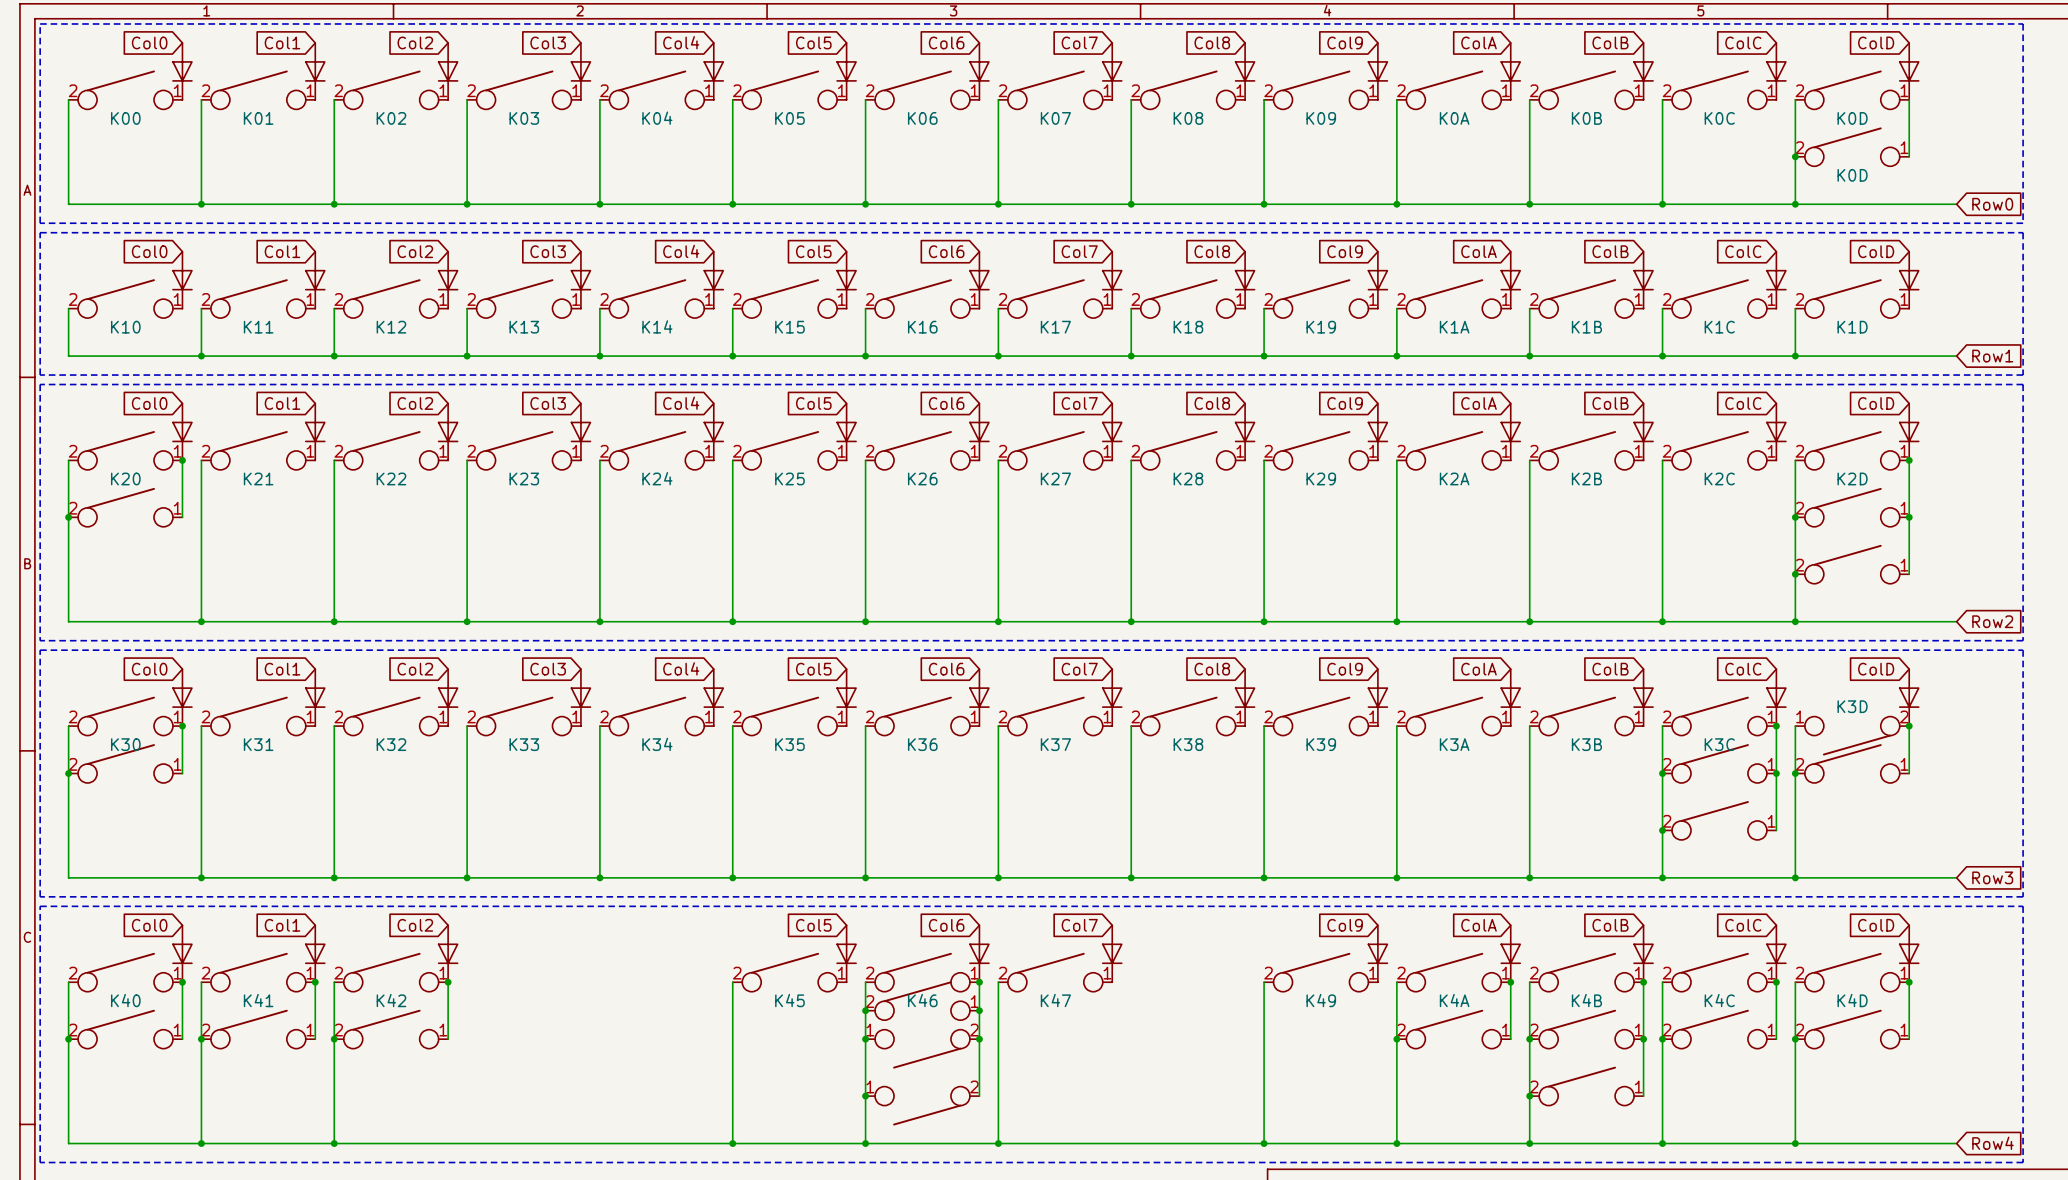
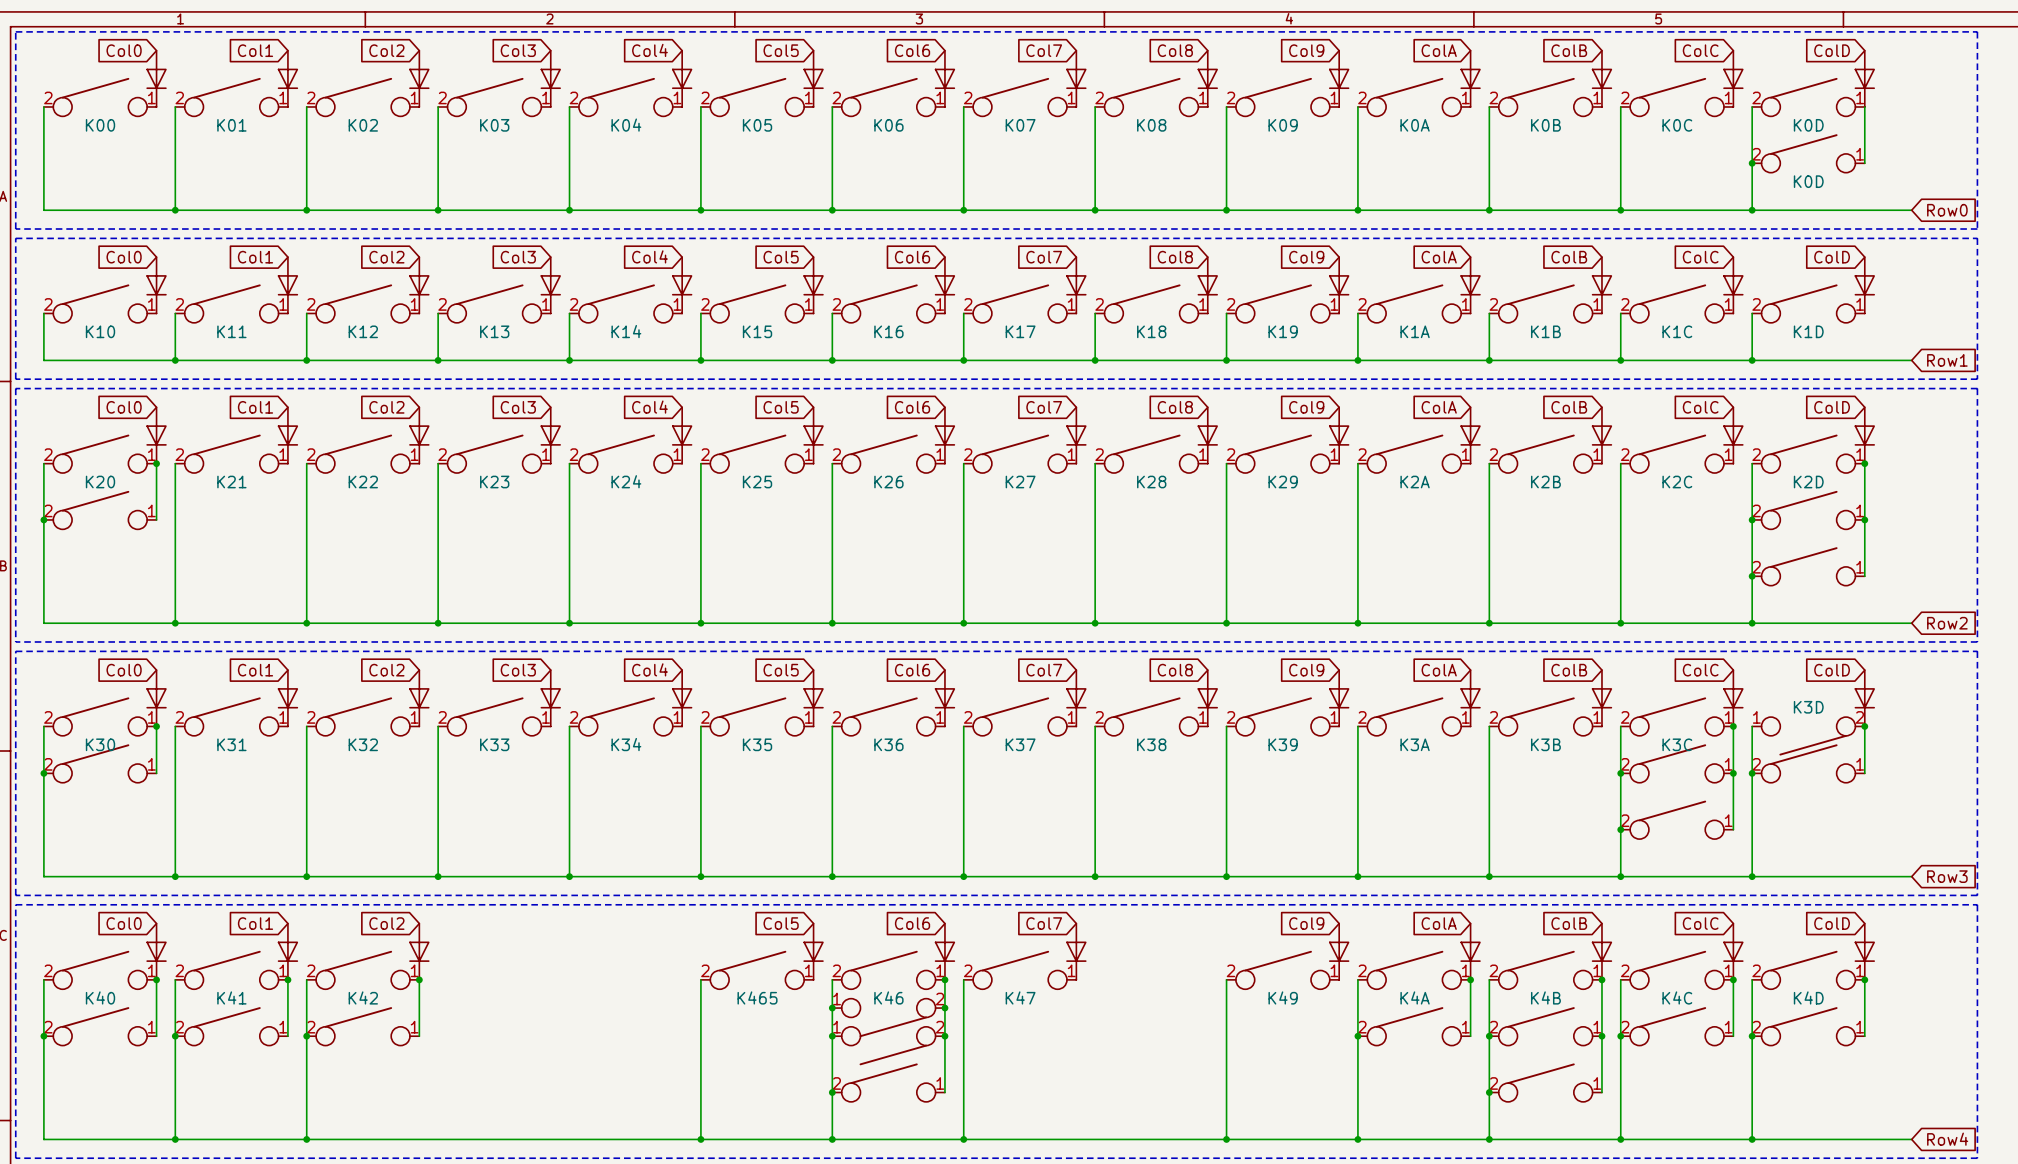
part value: K45 (789, 1000) -> K465 (757, 997)
part rotation: 0° (922, 1000) -> 180° (888, 1017)
part rotation: 0° (922, 1106) -> 180° (888, 1082)

